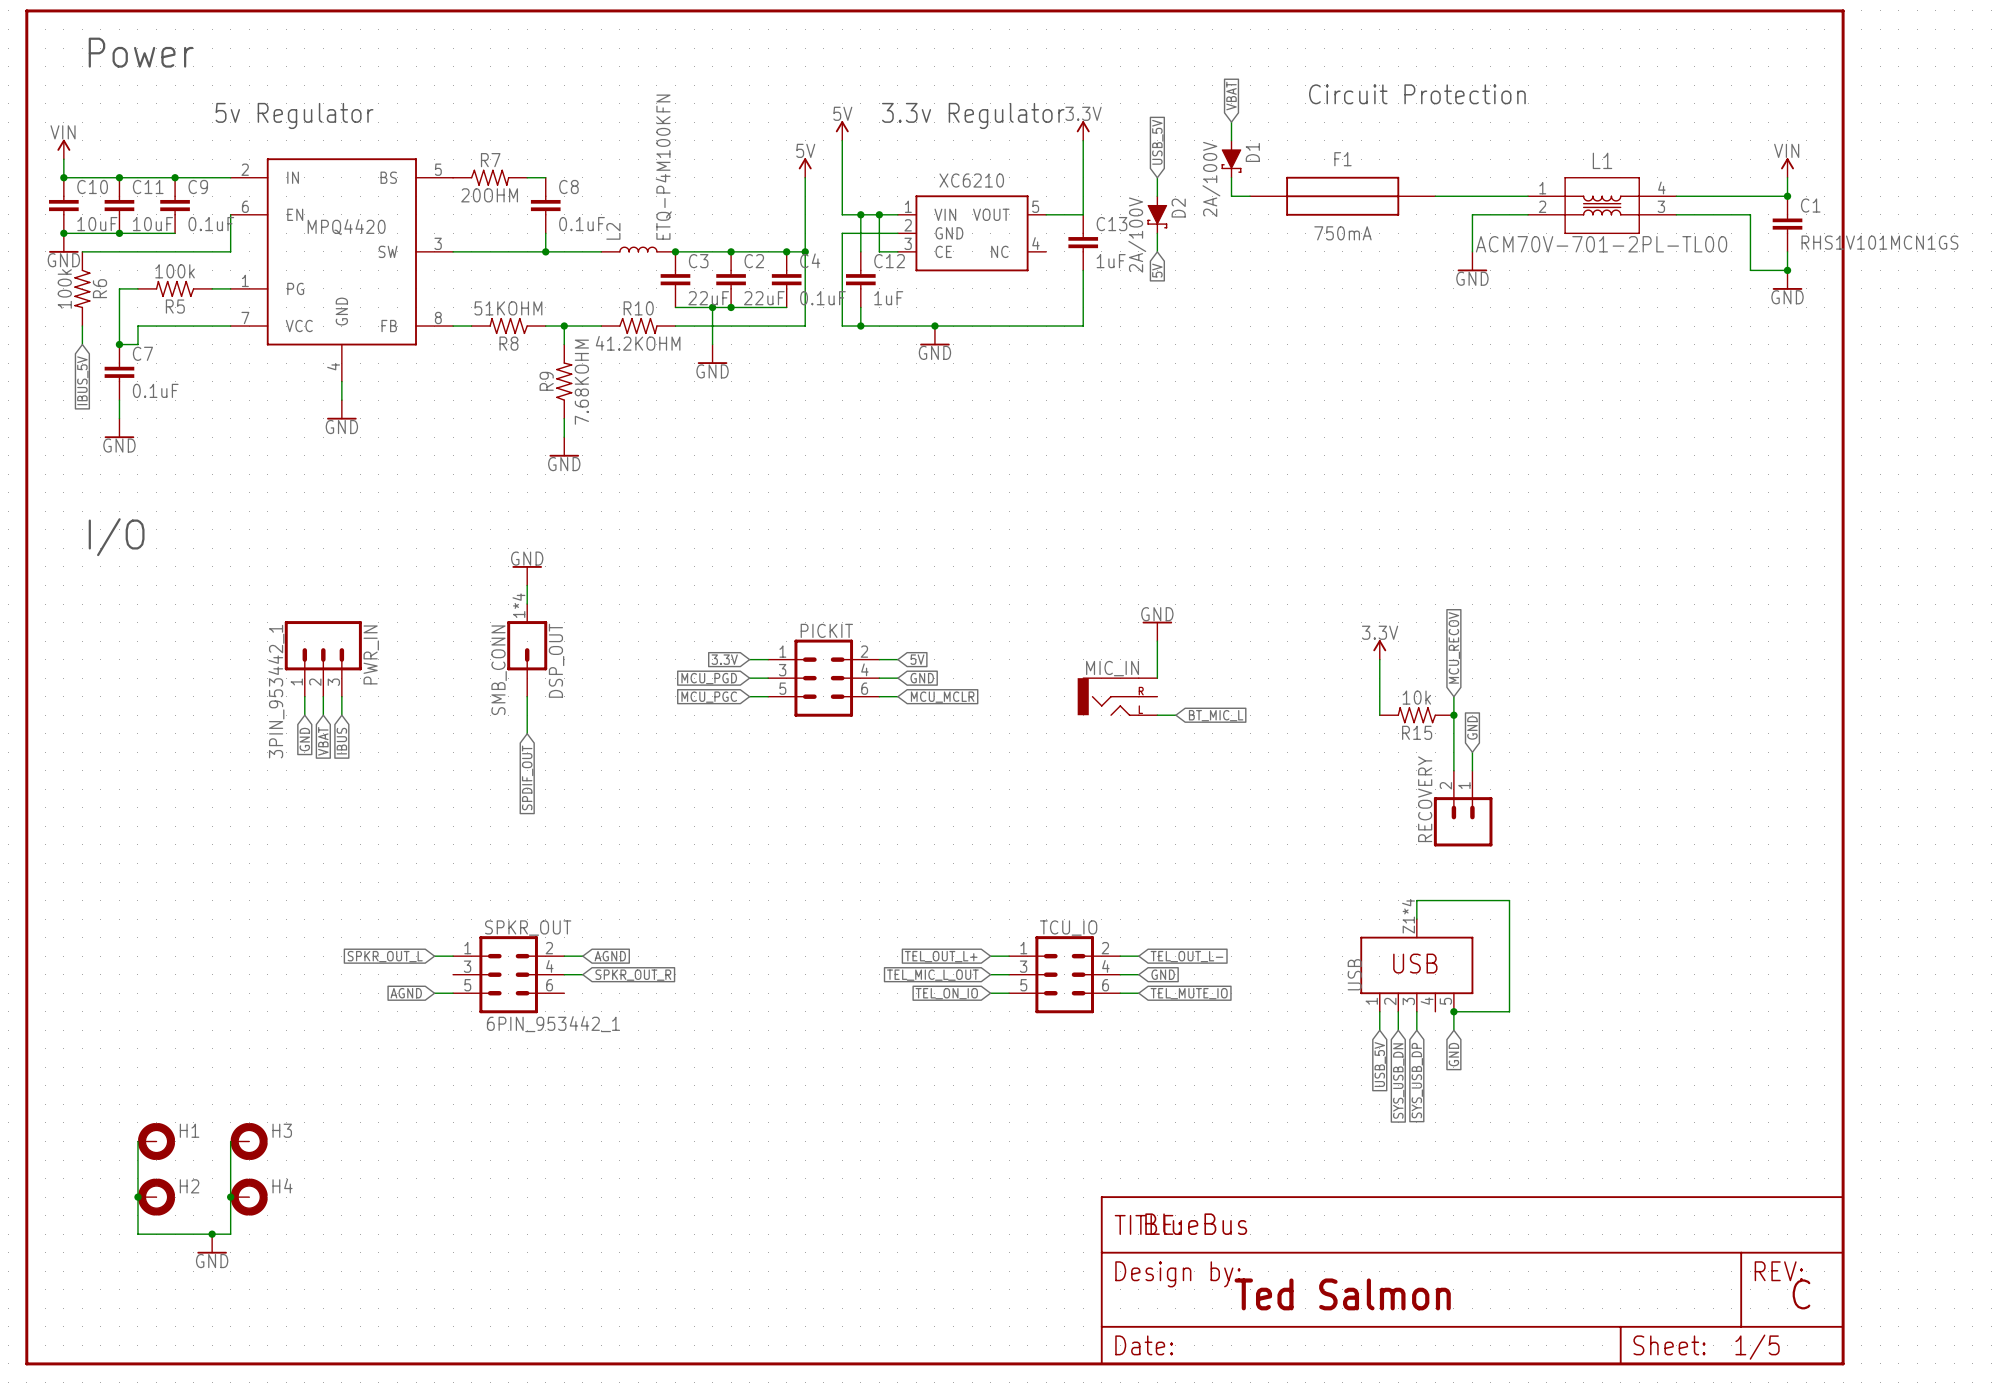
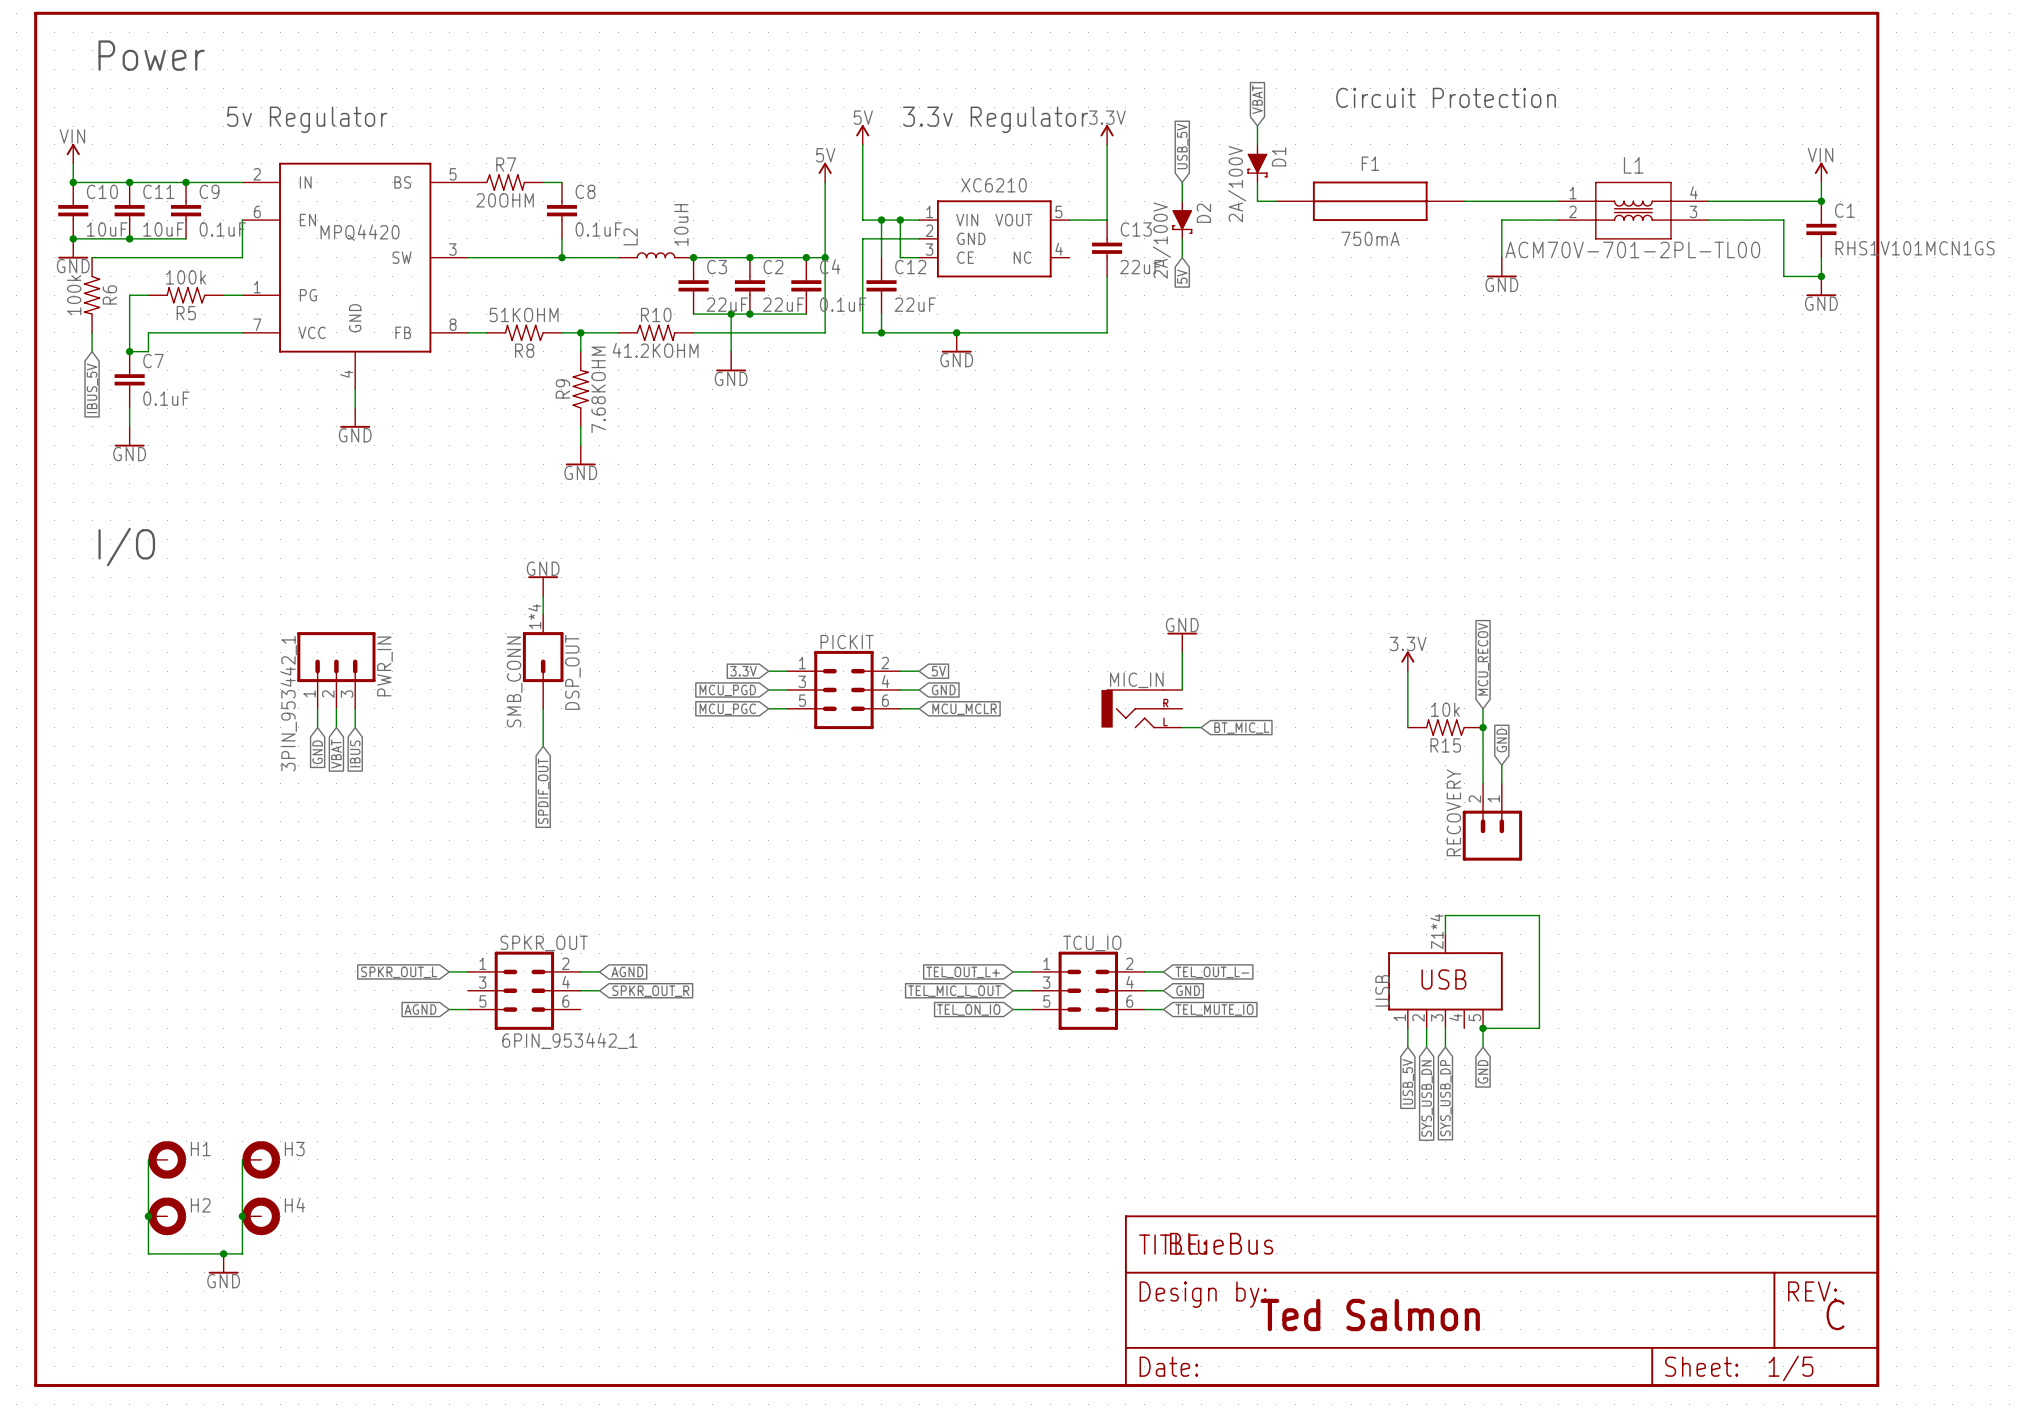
L2 value: ETQ-P4M100KFN (663, 167) -> 10uH (681, 225)
C13 value: 1uF (1111, 261) -> 22uF (1140, 267)
C12 value: 1uF (888, 298) -> 22uF (915, 304)

